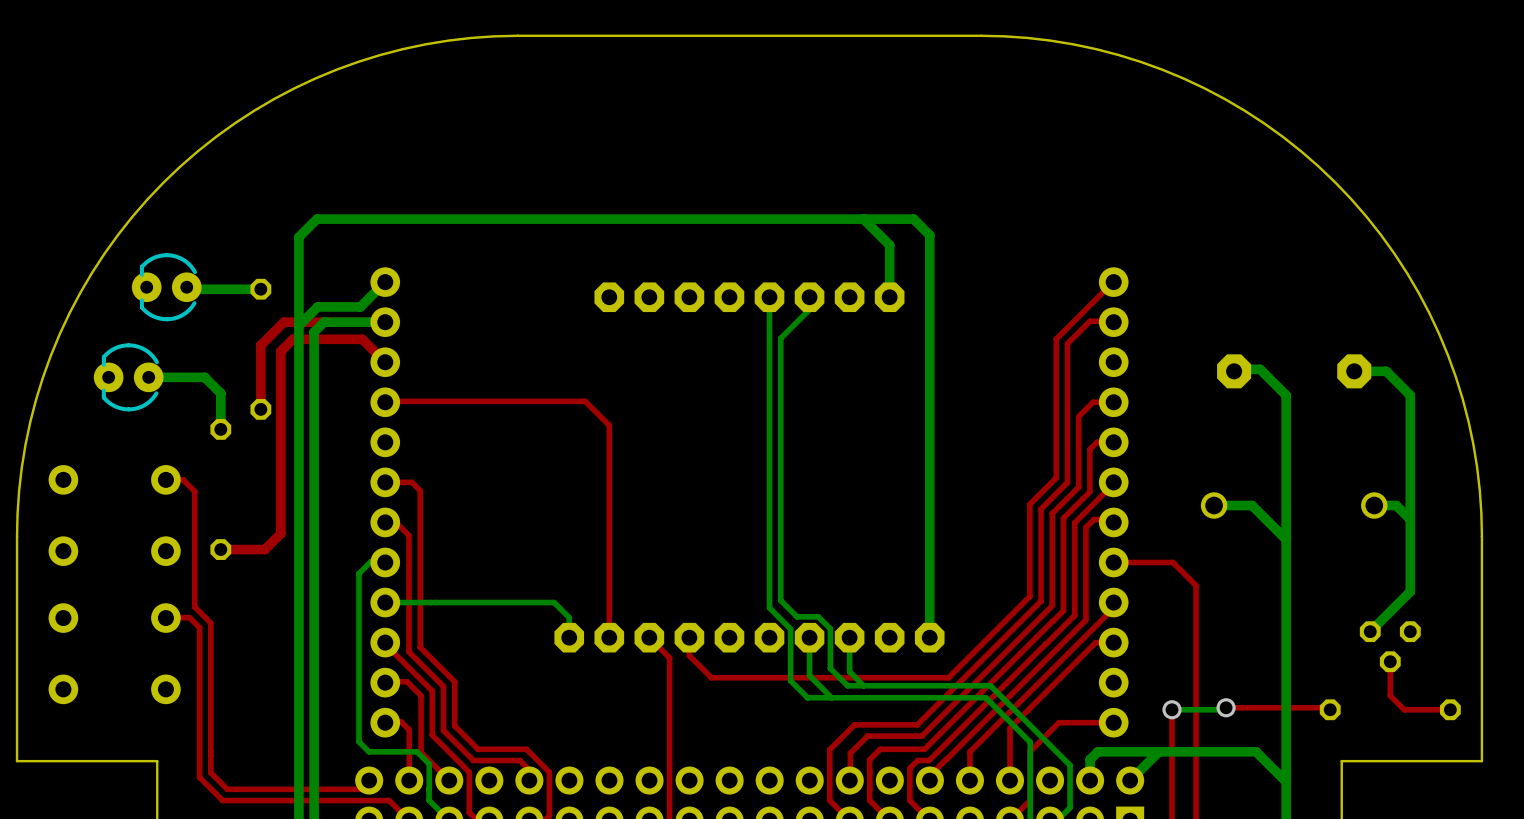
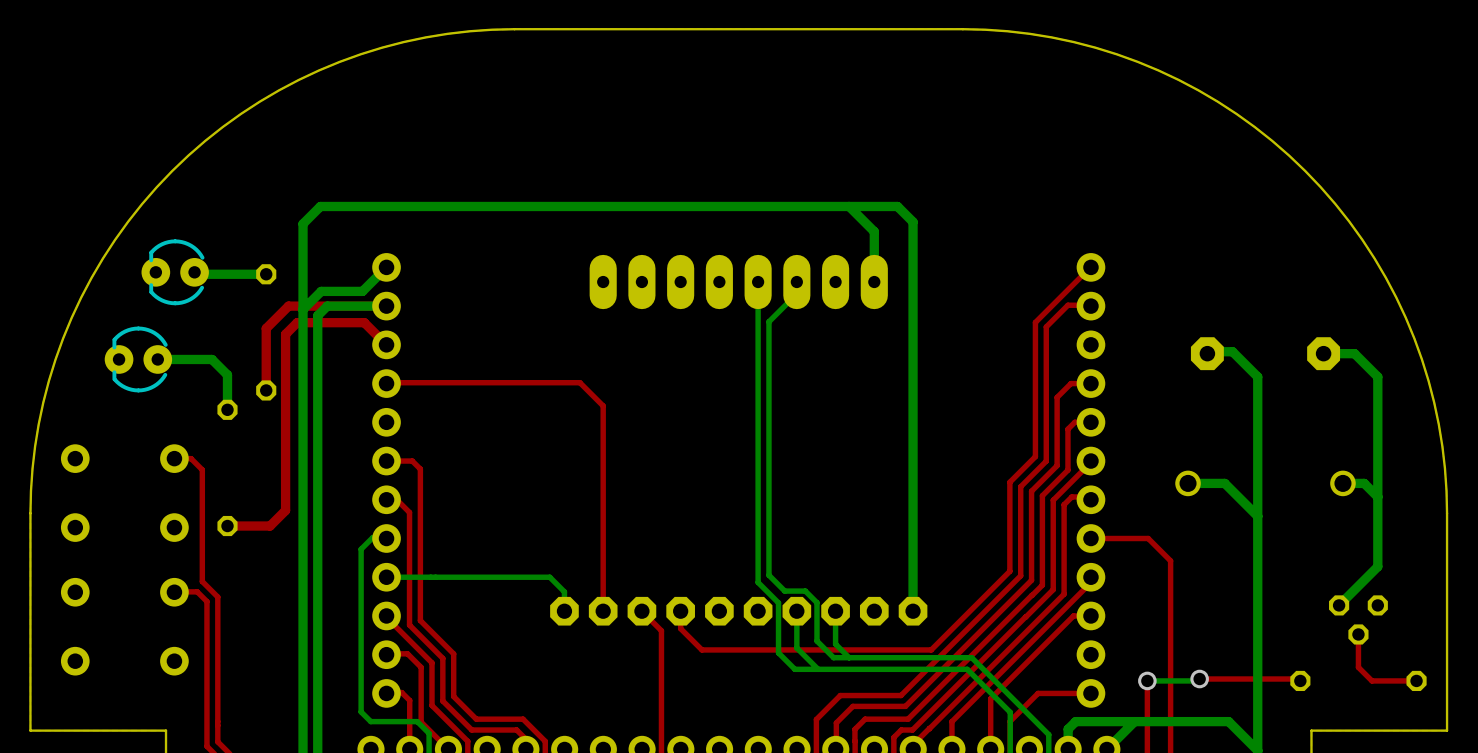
part footprint: [594, 282, 905, 313] -> [589, 254, 888, 310]

